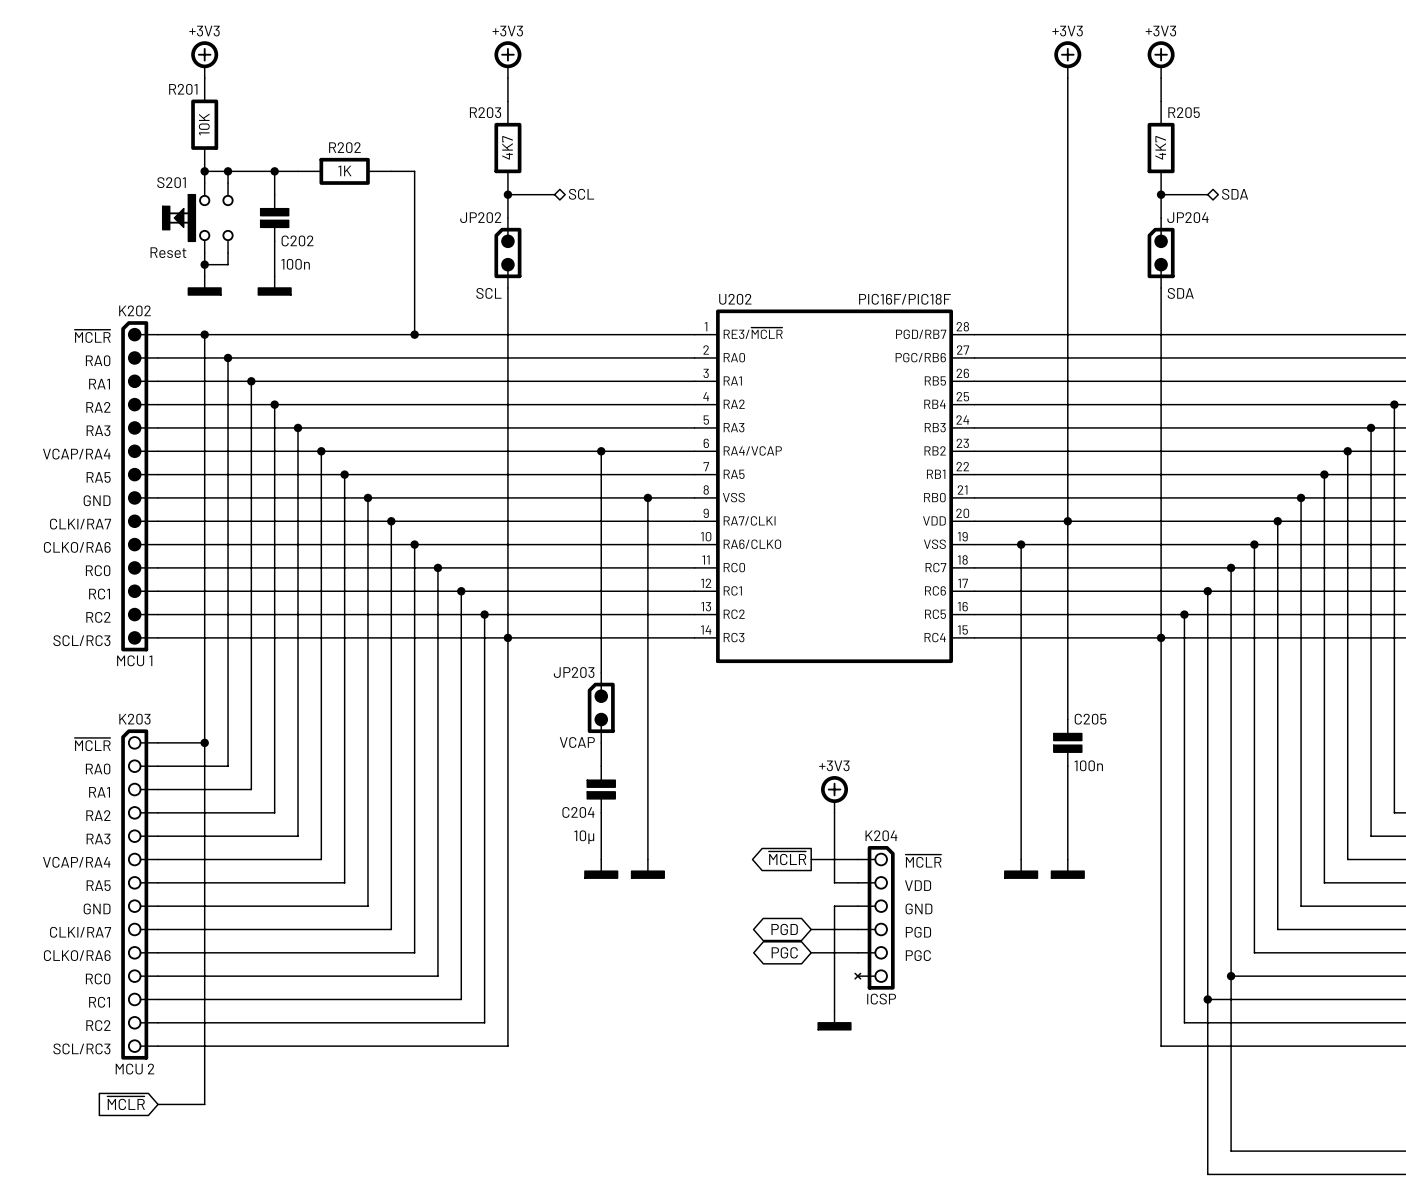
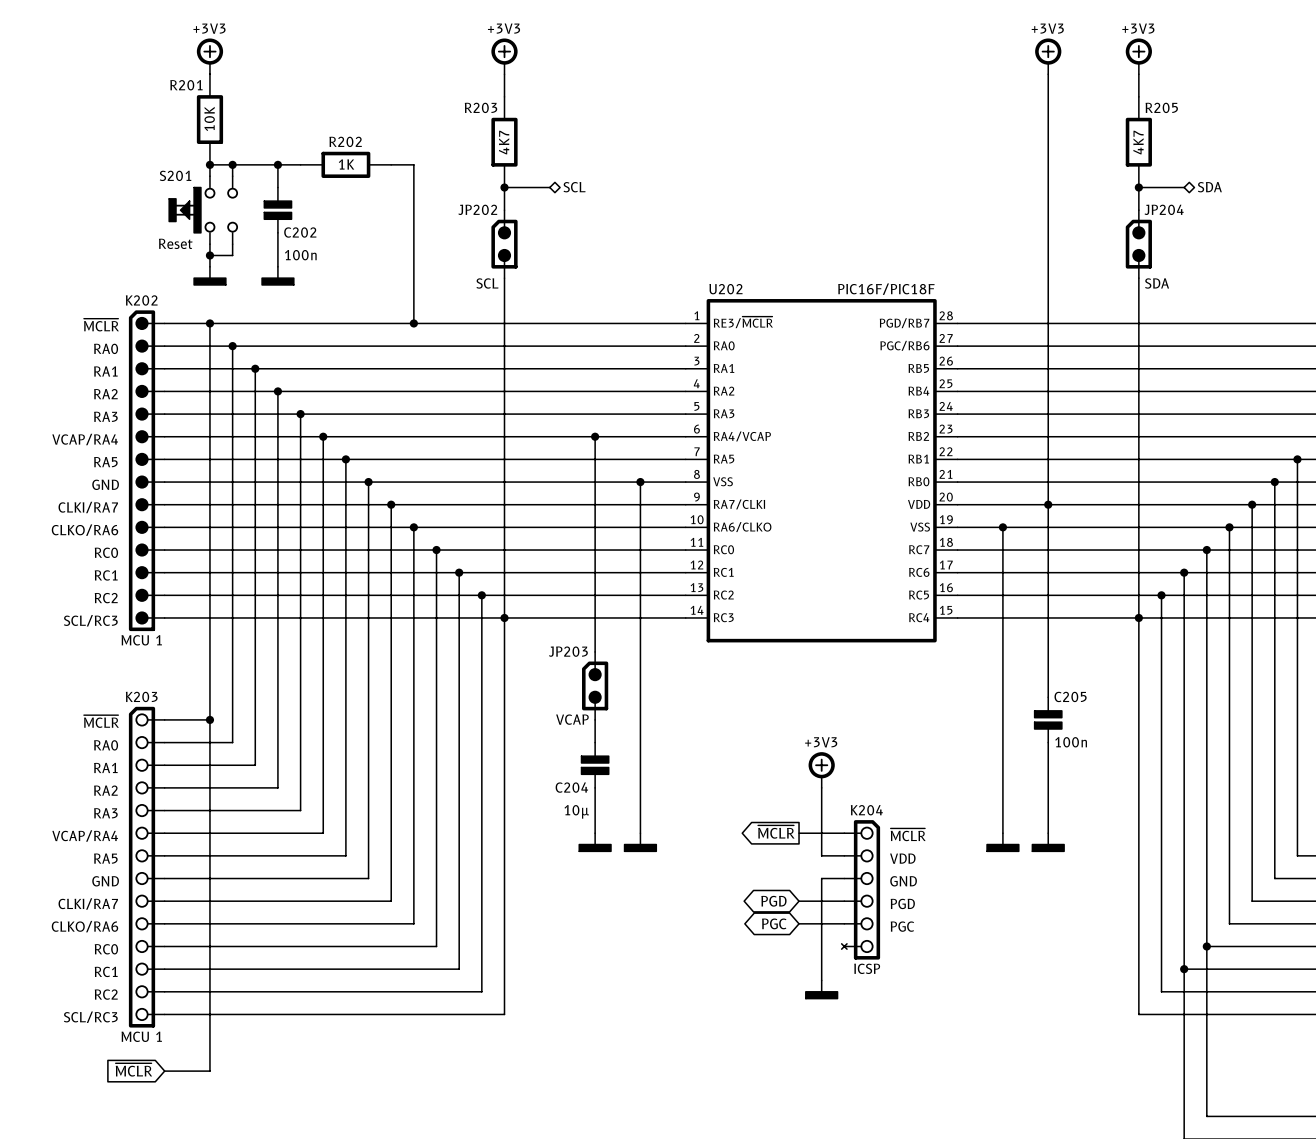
K203 value: MCU 2 (134, 1069) -> MCU 1 (141, 1036)

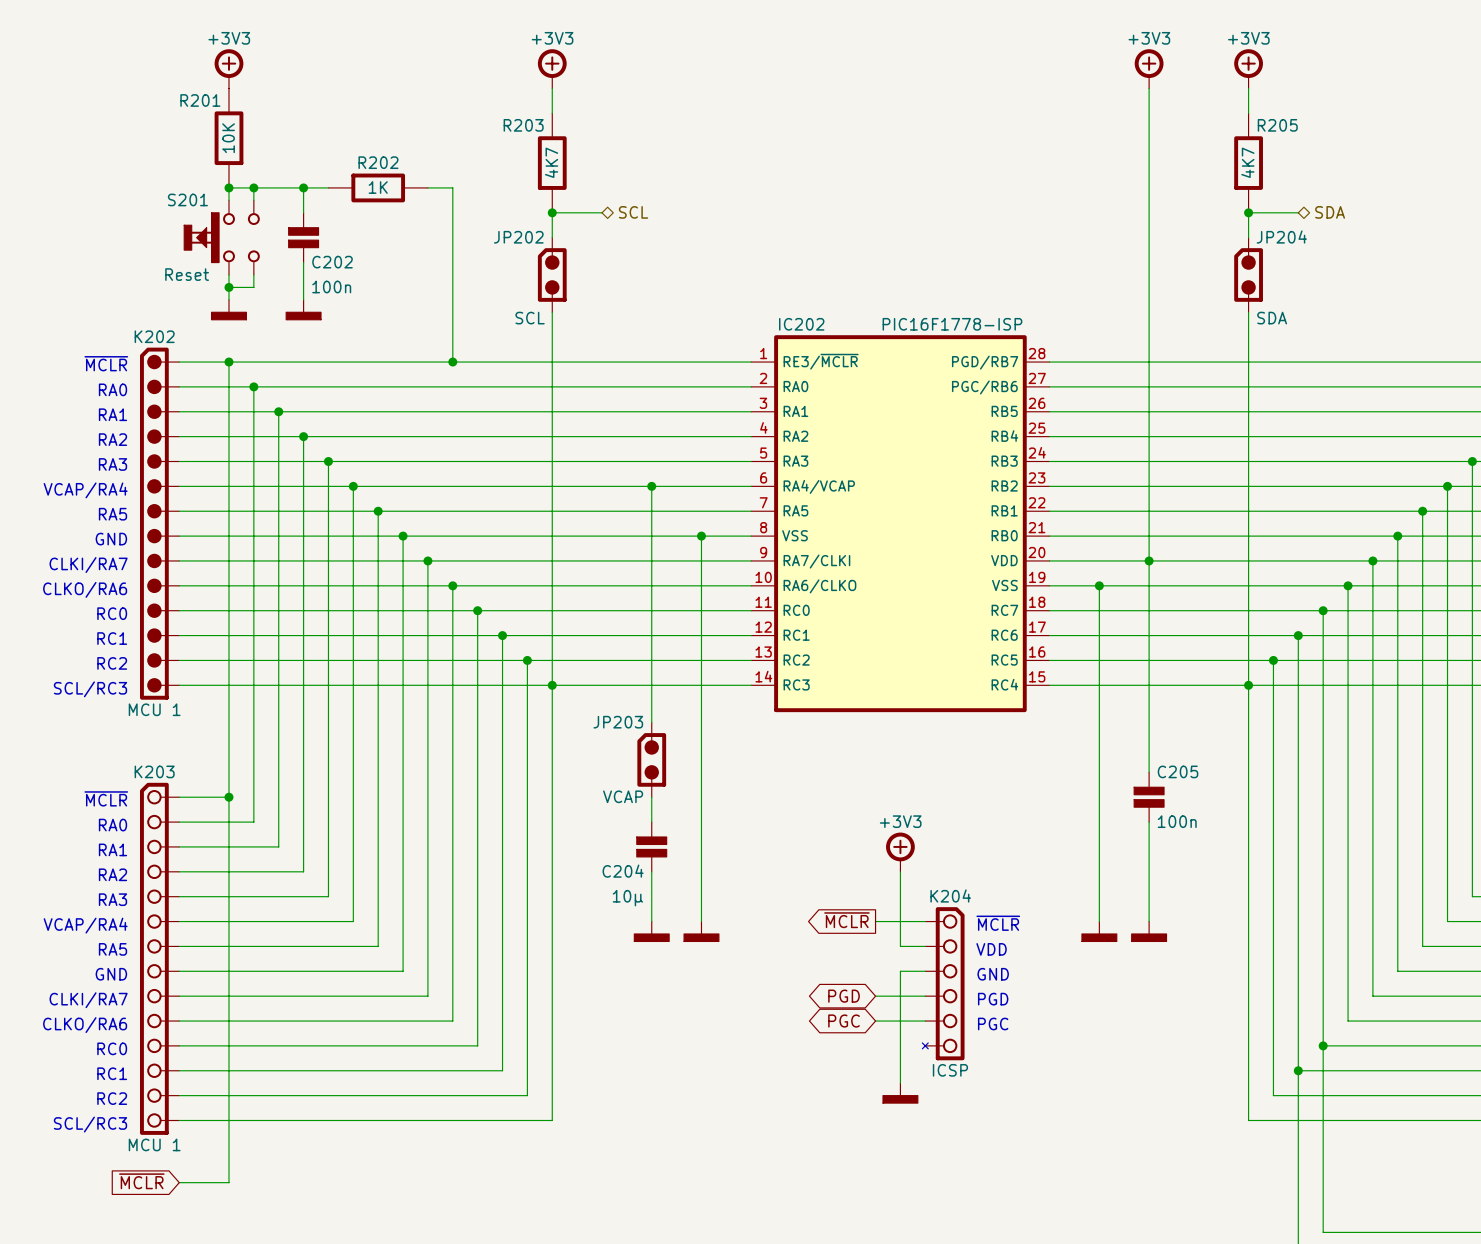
U202 name: U202 (725, 289) -> IC202 (801, 324)
U202 text: PIC16F/PIC18F (886, 289) -> PIC16F1778-ISP (952, 324)

